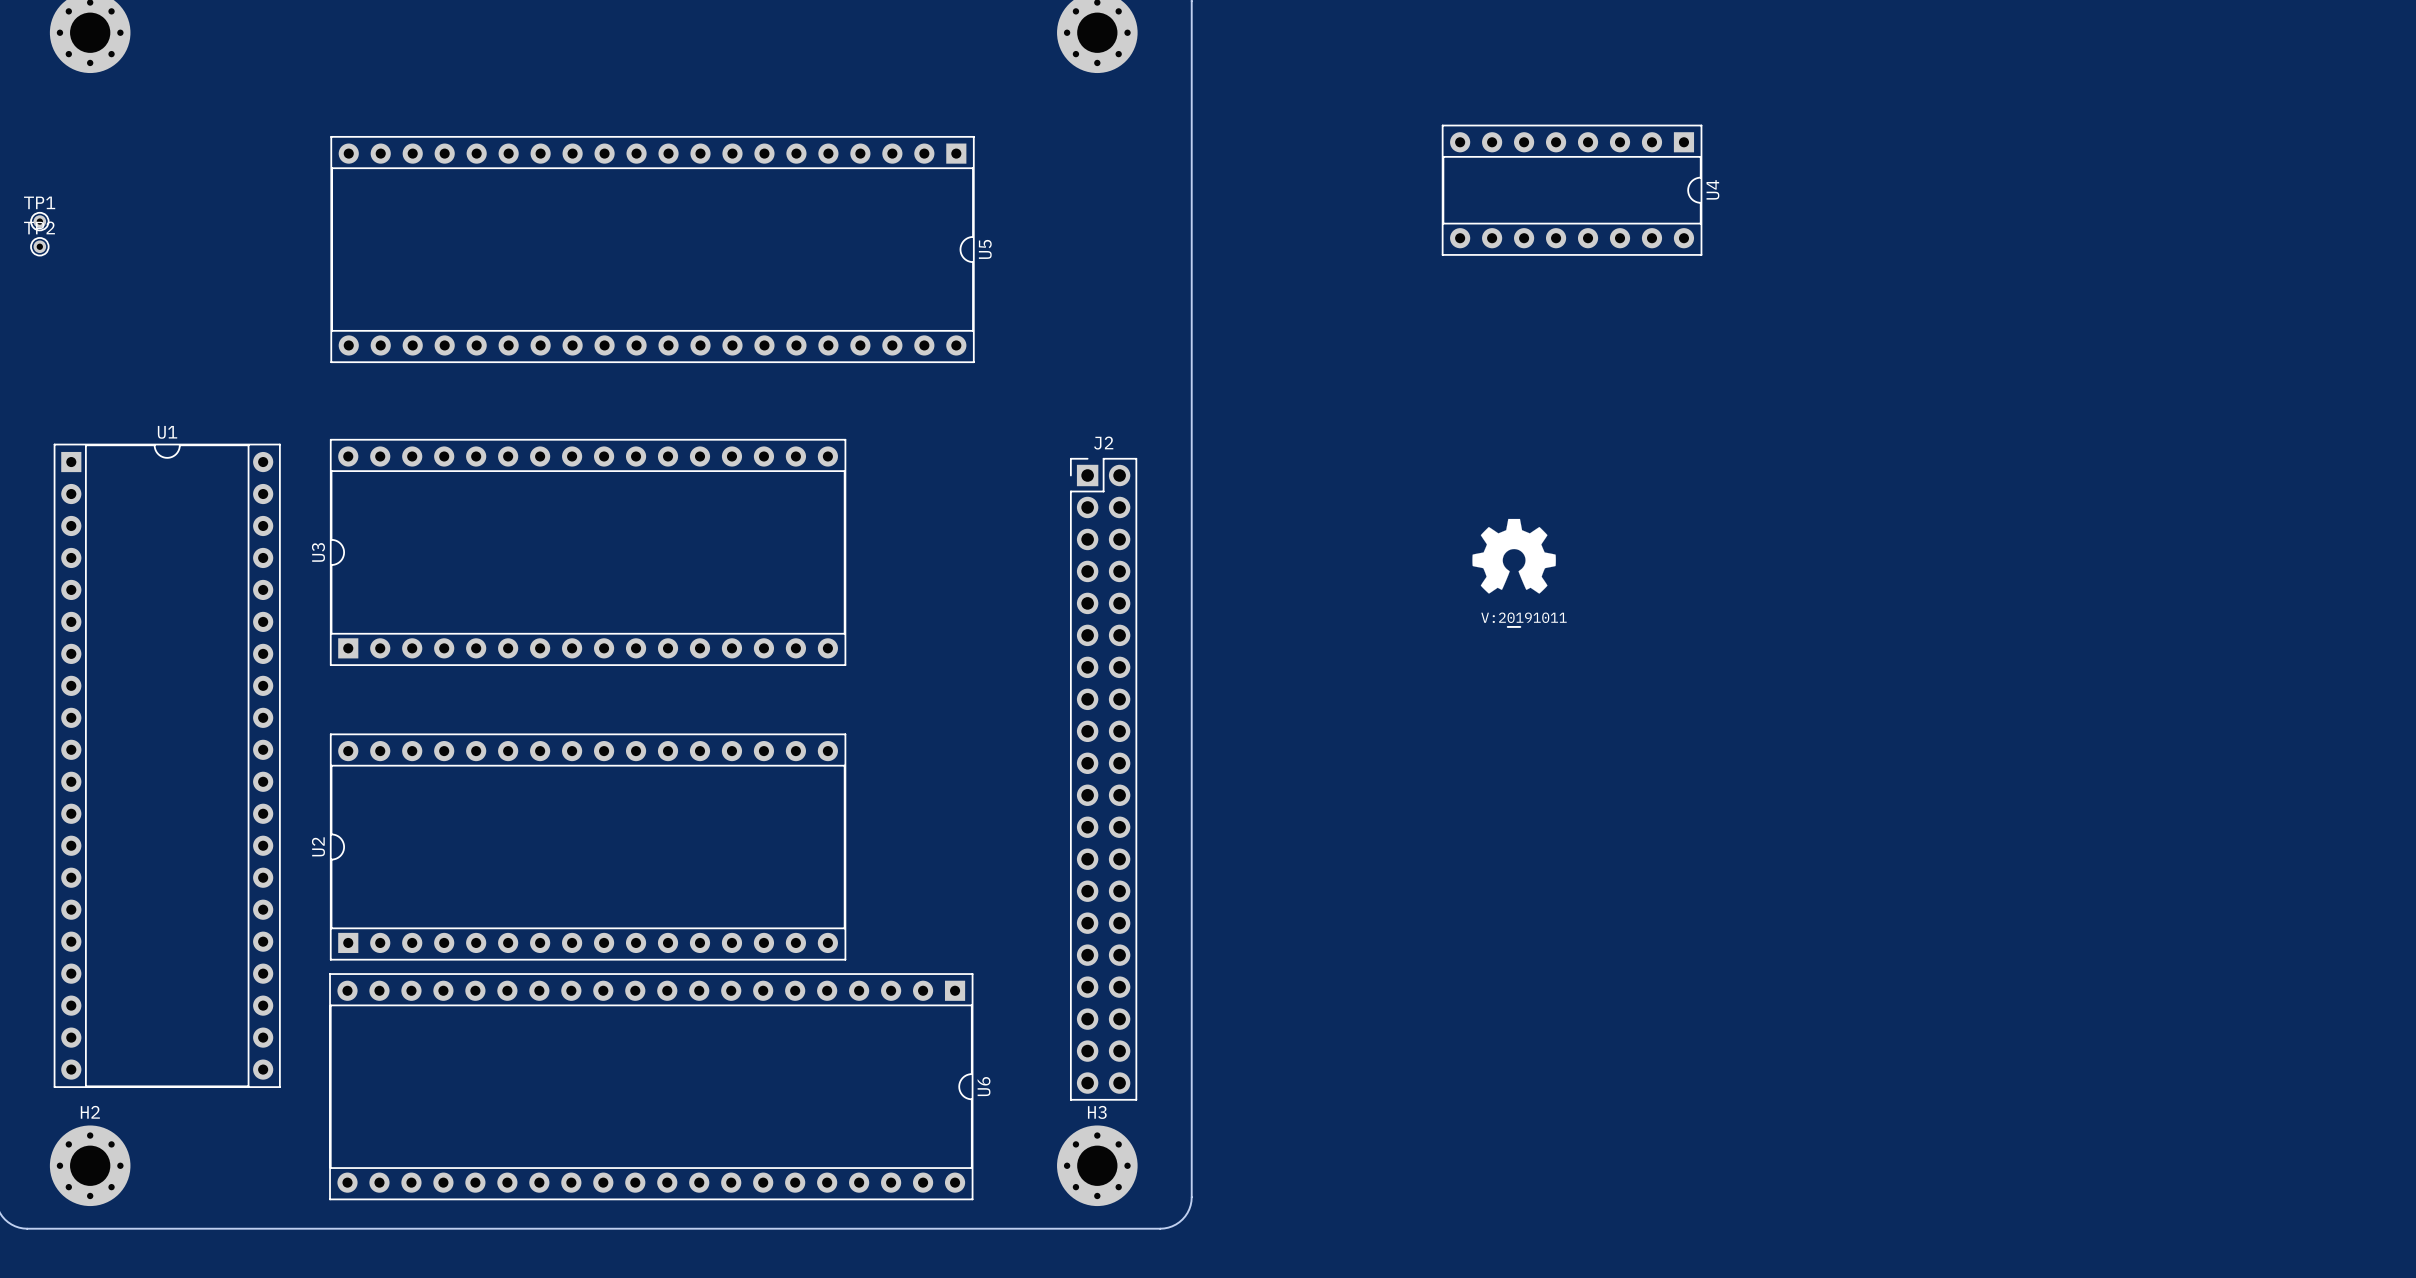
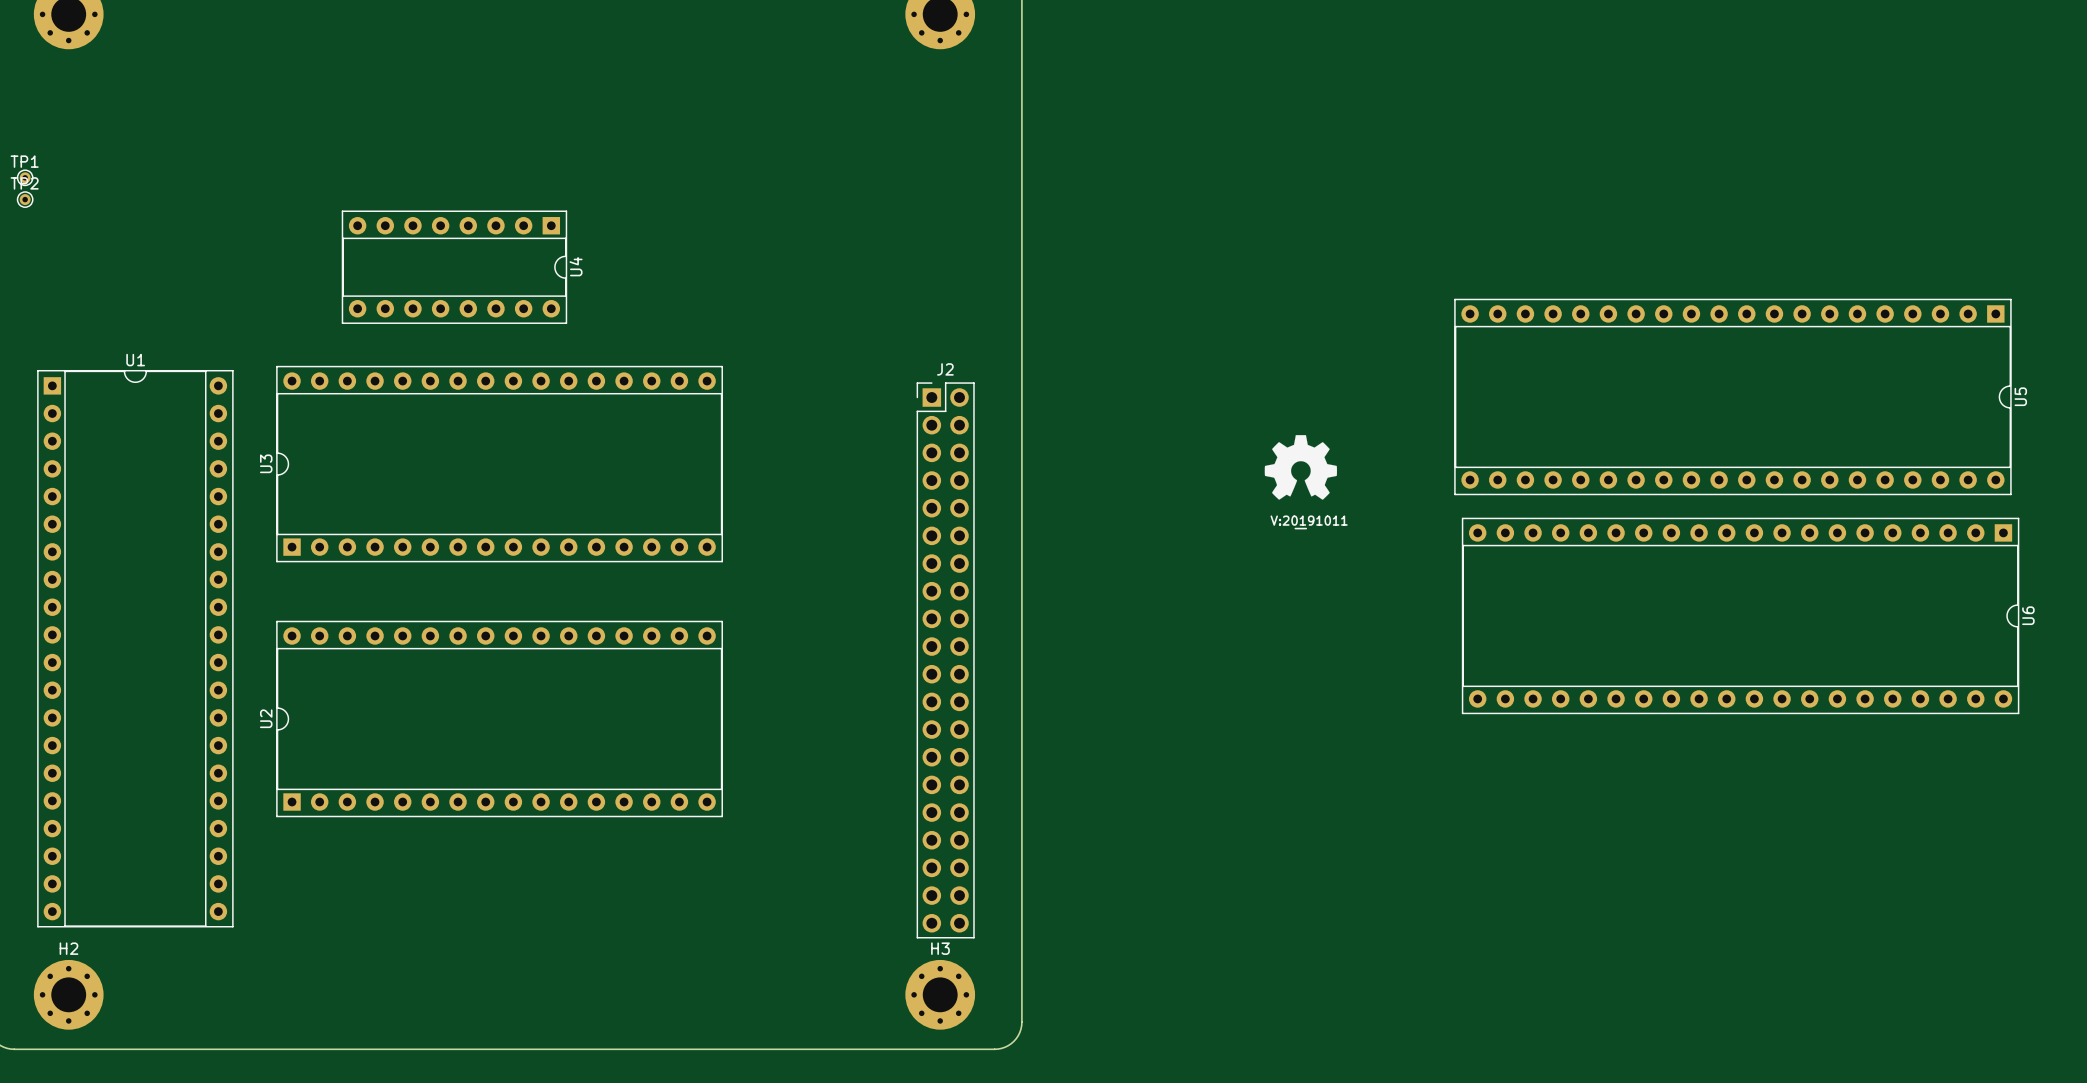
U4 position: (1572, 190) -> (454, 267)
U5 position: (652, 249) -> (1732, 396)
U6 position: (651, 1086) -> (1740, 615)

